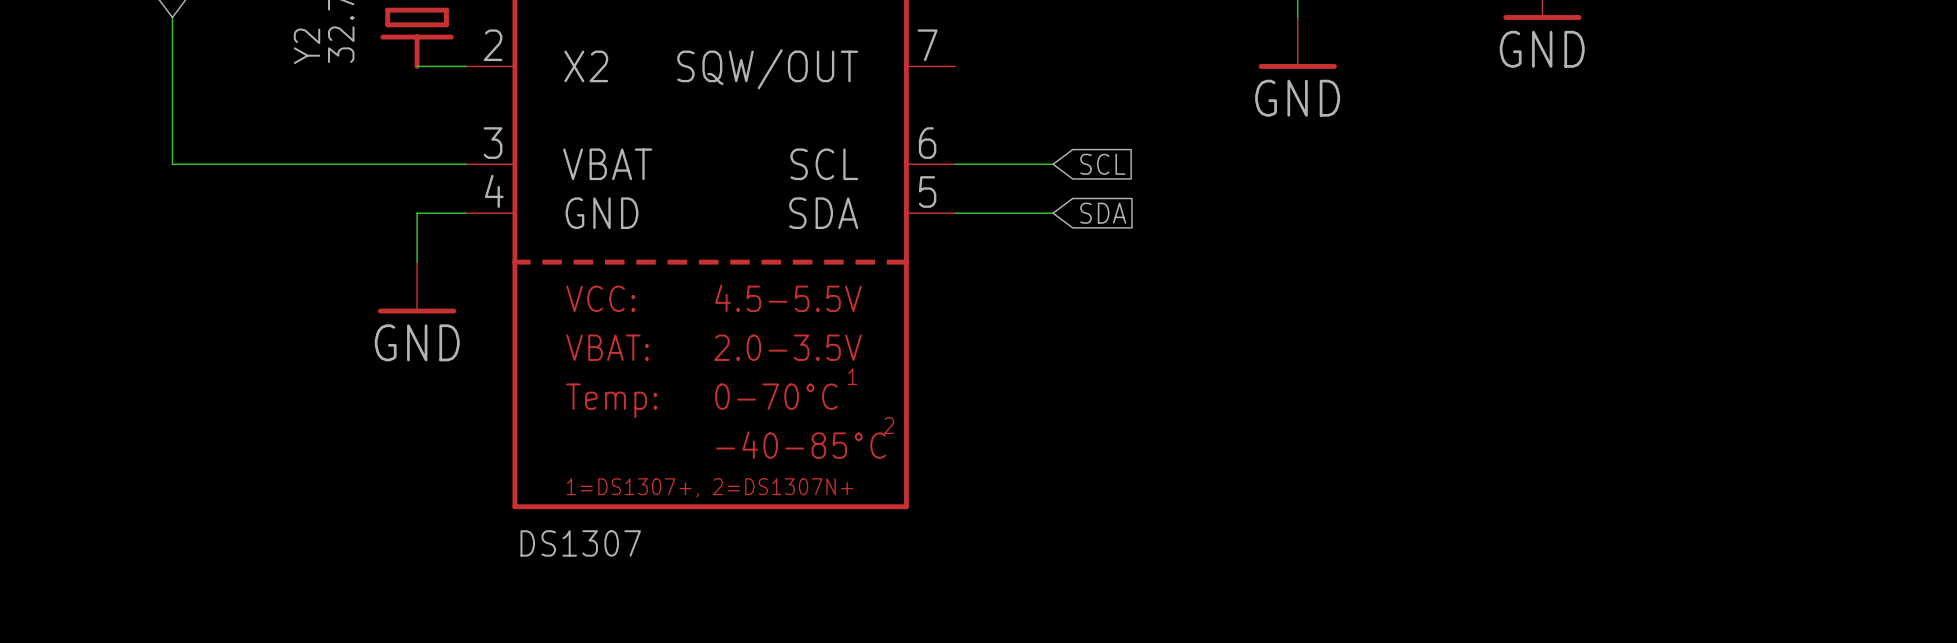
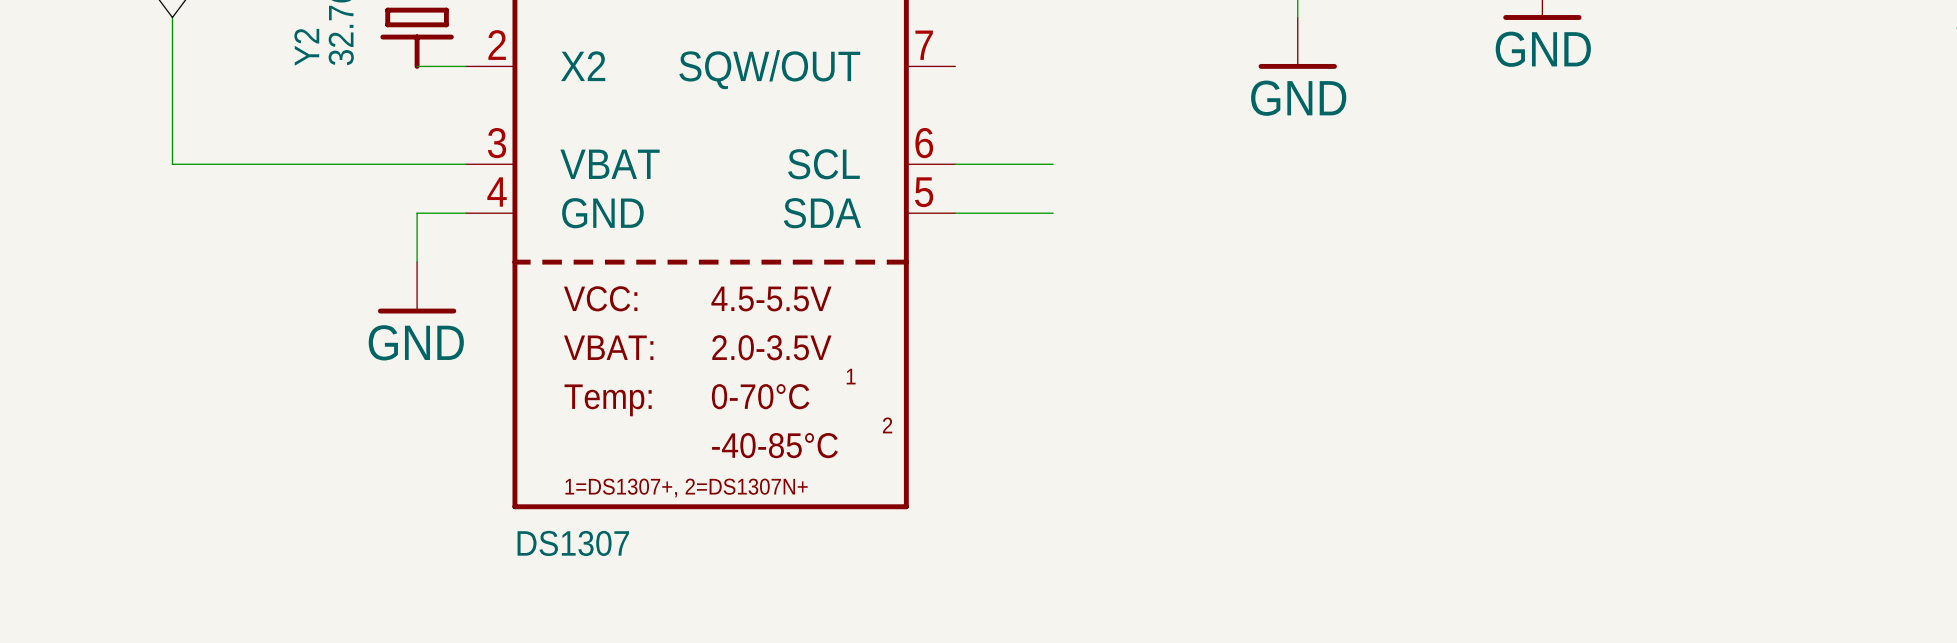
global label: SCL (1102, 164) -> none
global label: SDA (1103, 213) -> none

